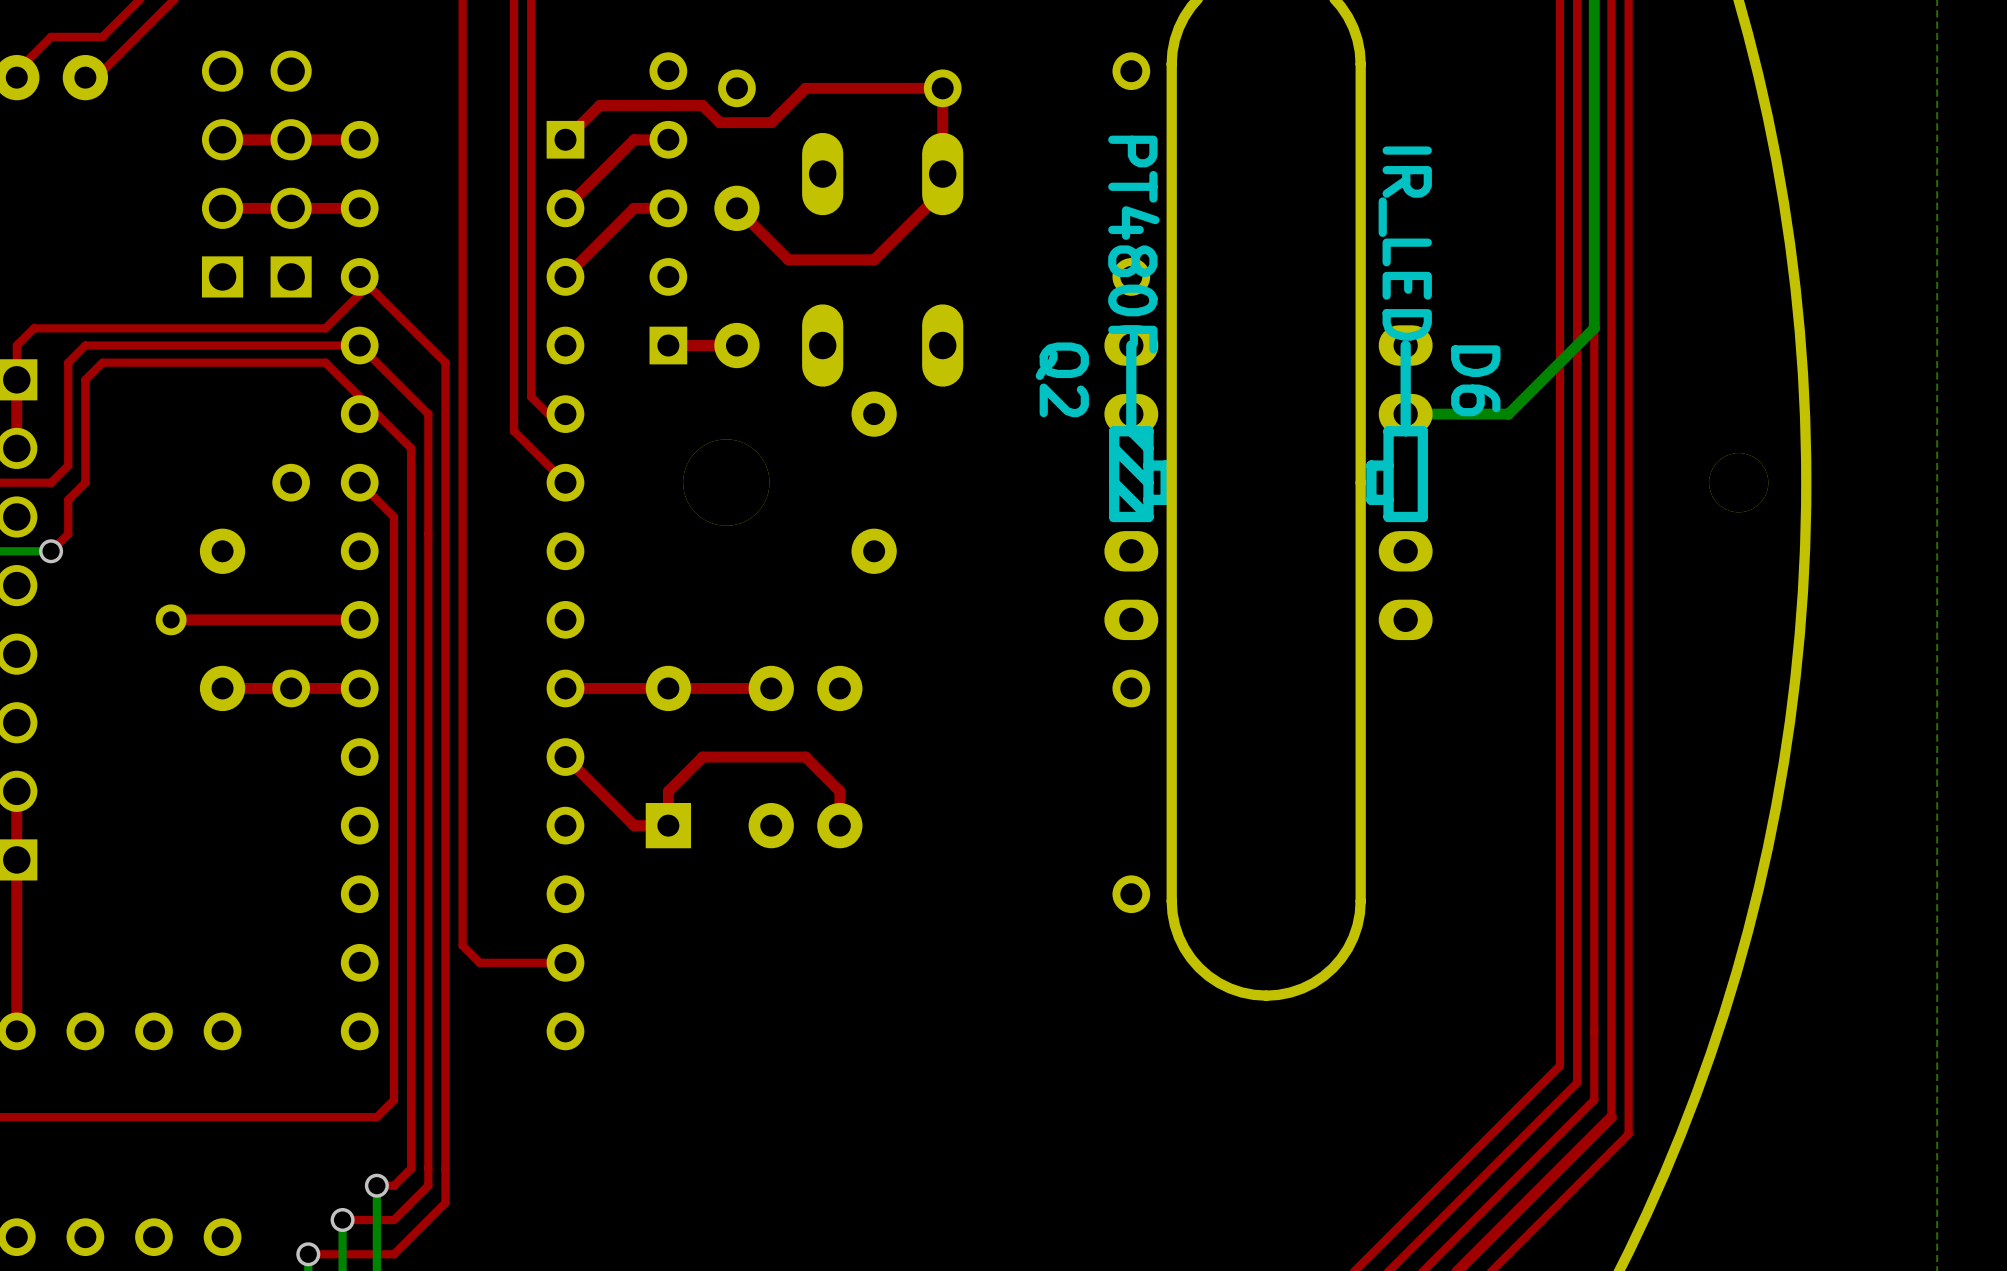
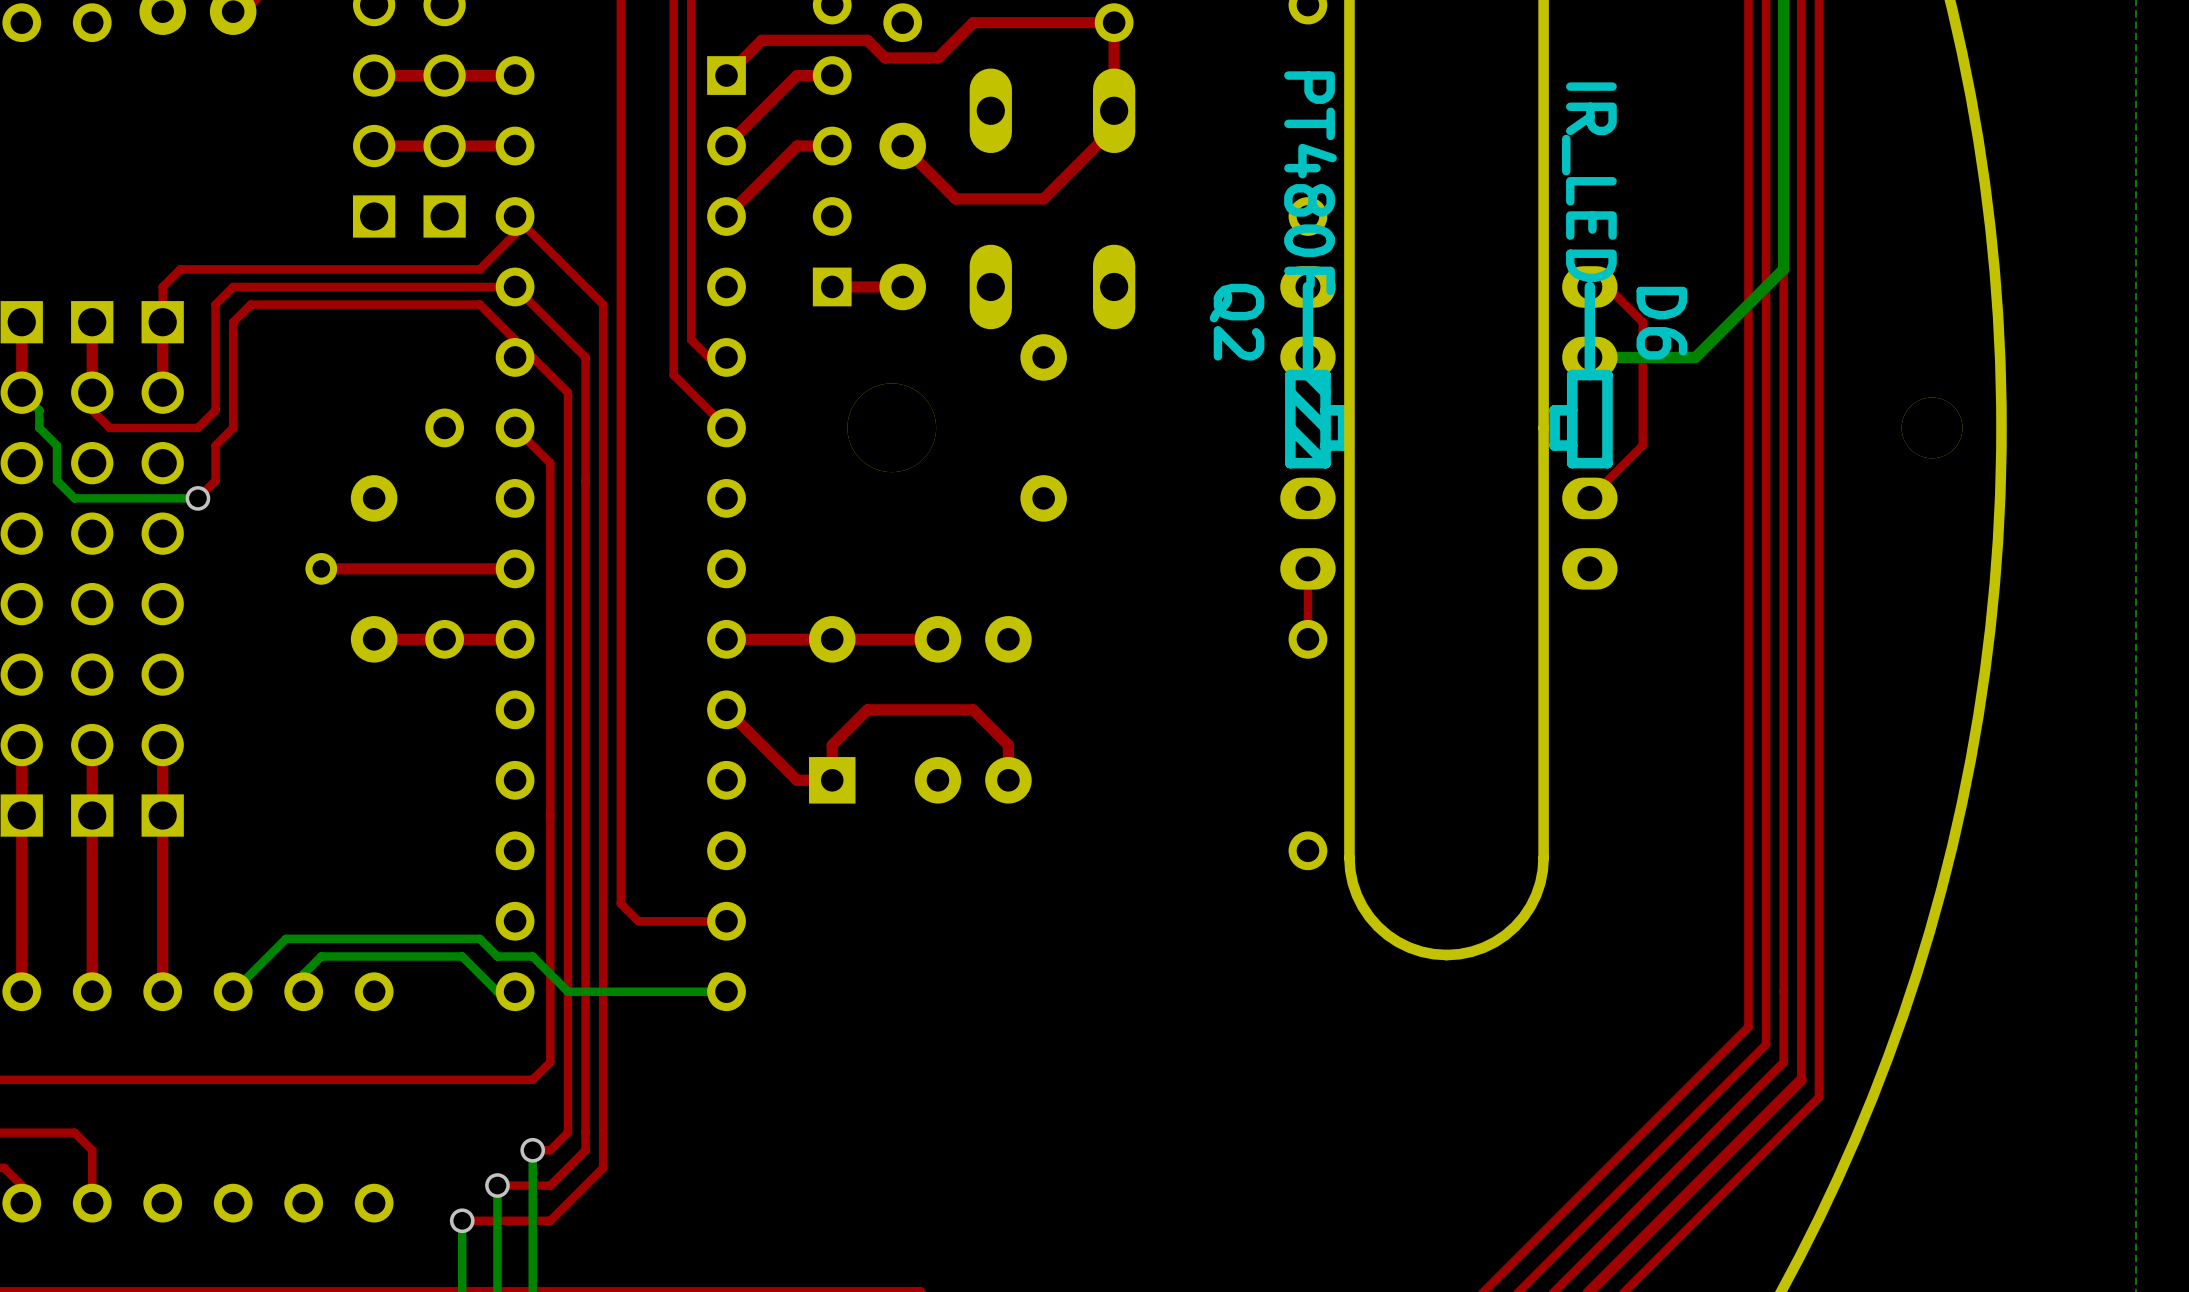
top track: none -> (1589, 286) (1607, 286) (1642, 322) (1642, 445) (1589, 498)
top track: none -> (1307, 568) (1307, 639)
bottom track: none -> (515, 991) (497, 991) (462, 956) (321, 956) (303, 974) (303, 991)
bottom track: none -> (726, 991) (567, 991) (532, 956) (497, 956) (479, 938) (286, 938) (233, 991)

